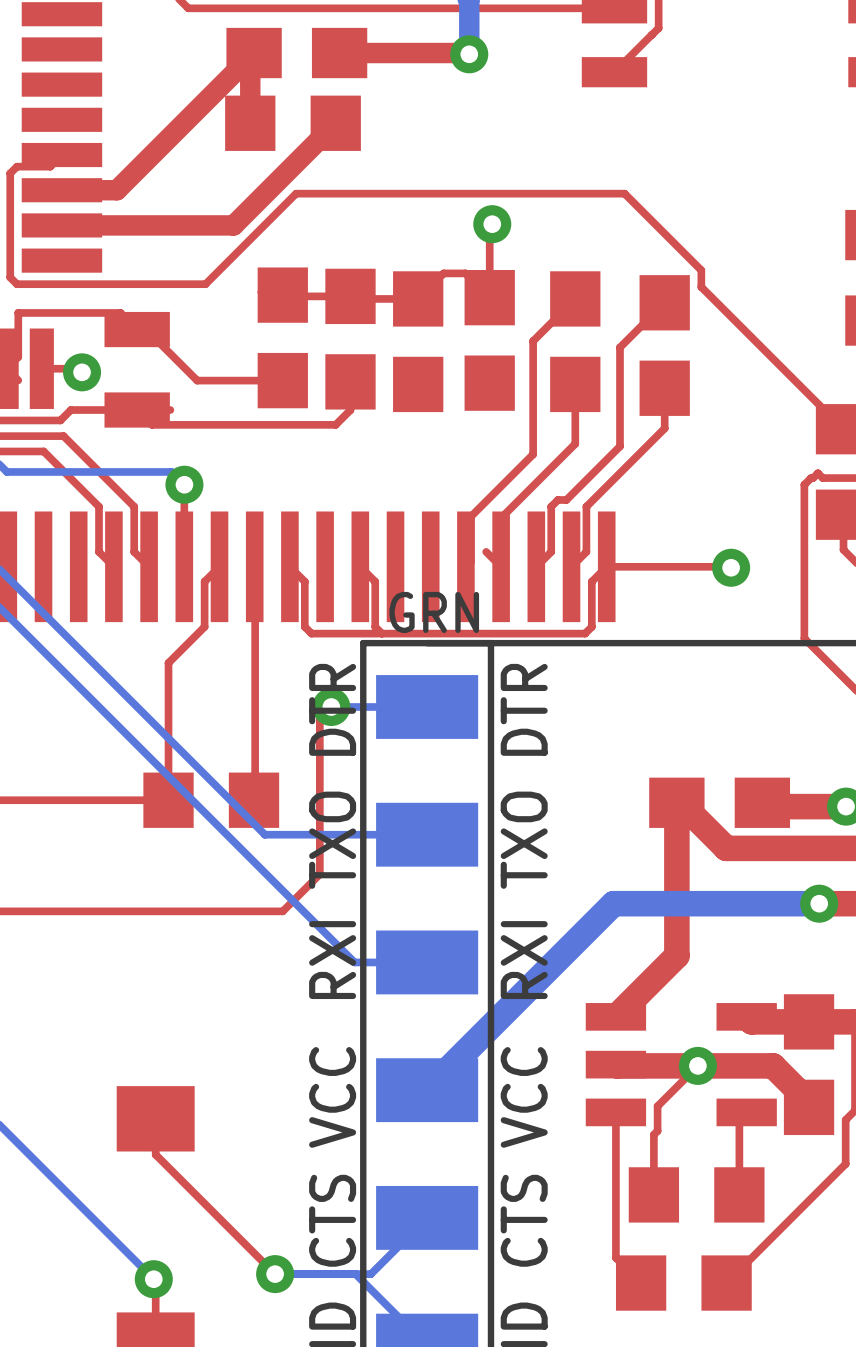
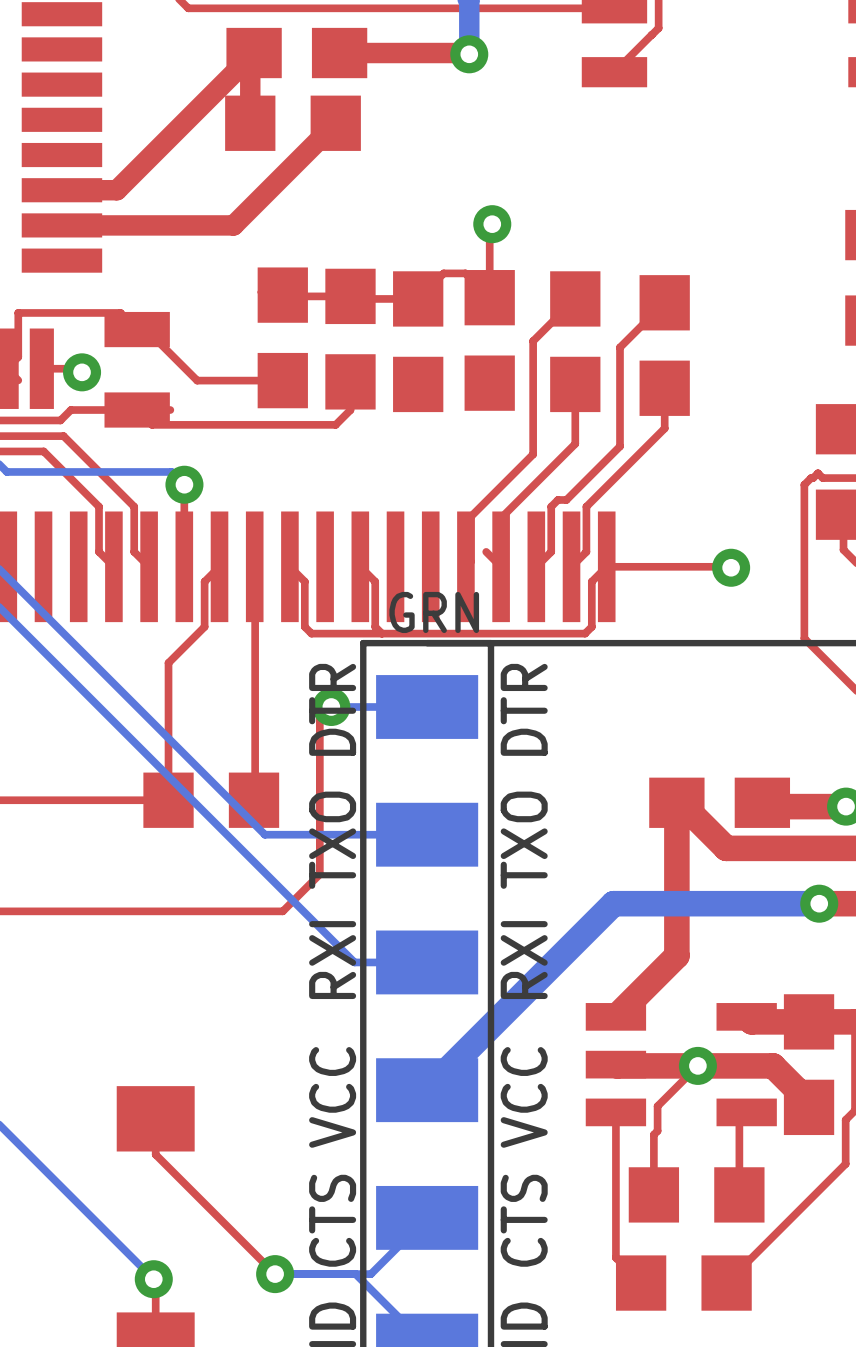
top track: (61, 155) (50, 166) (16, 166) (10, 173) (10, 277) (16, 284) (205, 284) (296, 193) (624, 193) (701, 270) (701, 287) (843, 429) -> none

